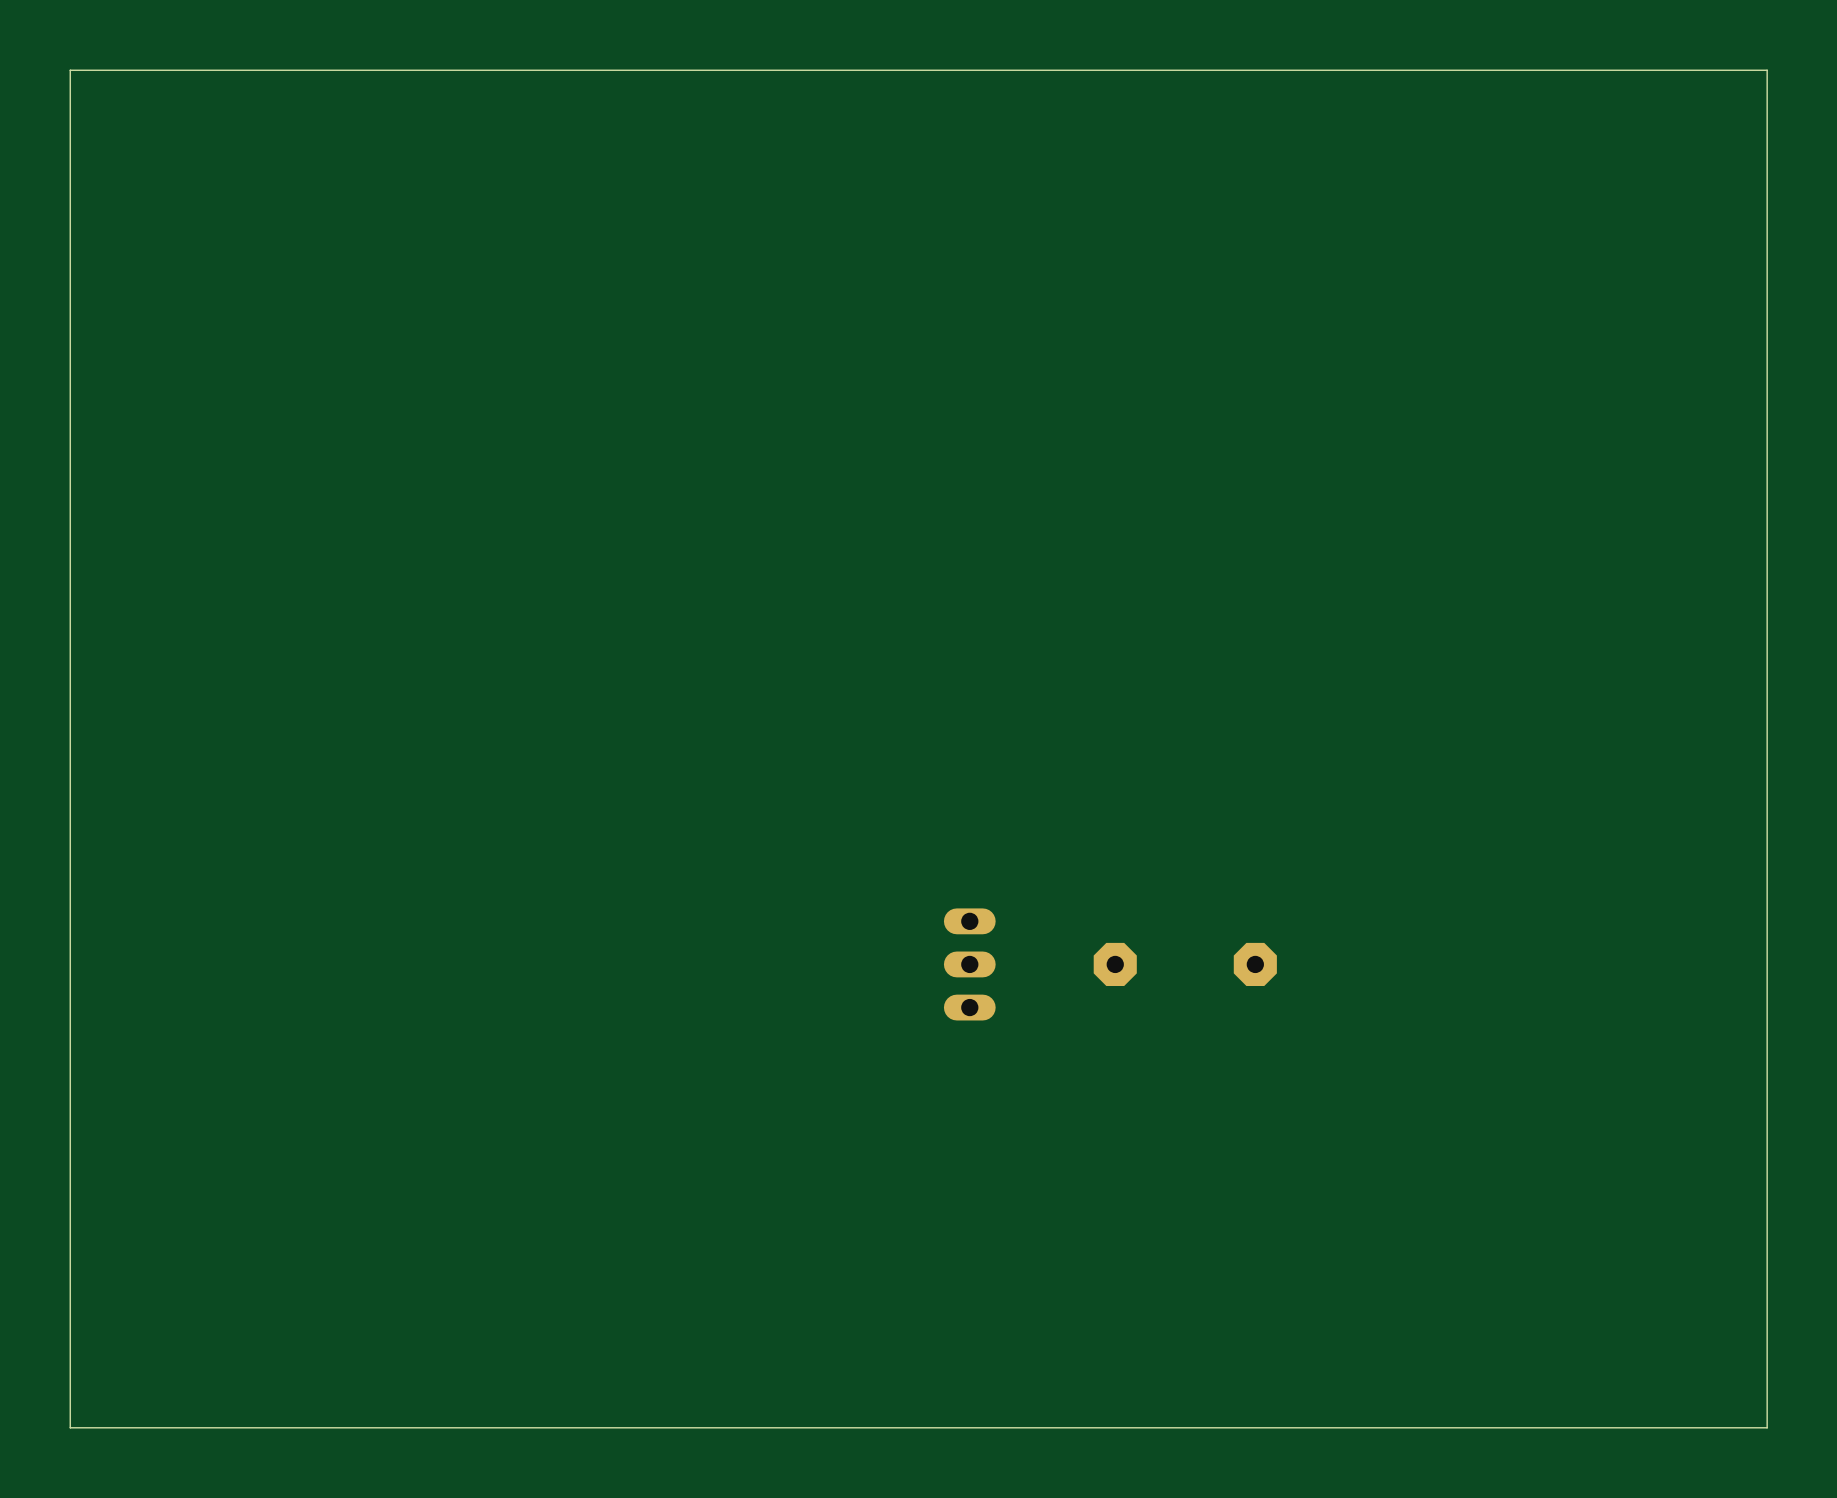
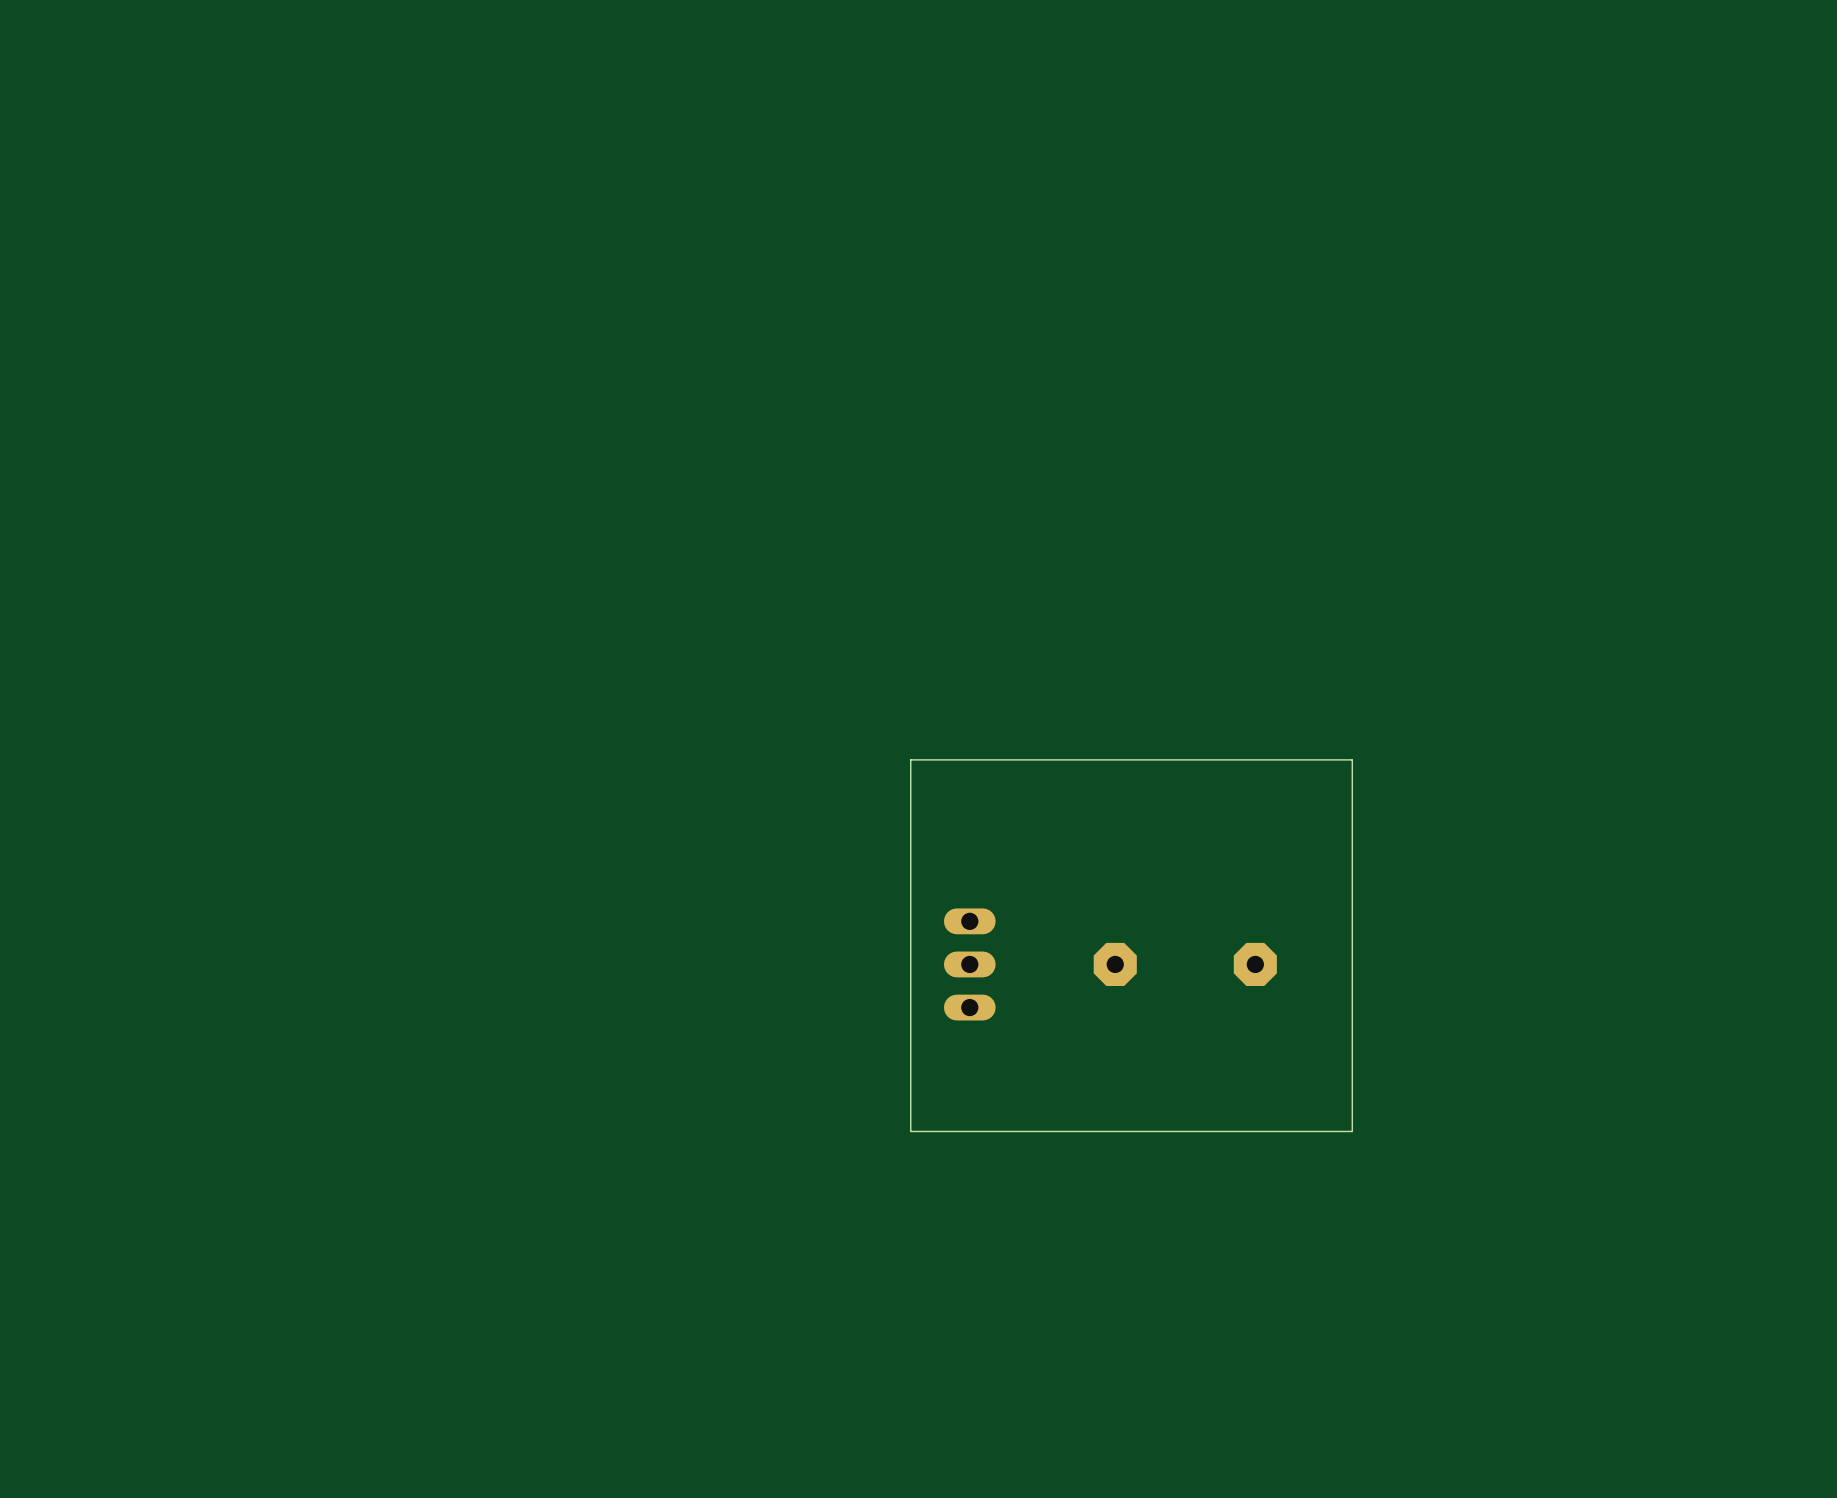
board edge: (1767, 70) (70, 70) (70, 1427) (1767, 1427) (1767, 70) -> none
board edge: none -> (1352, 759) (910, 759) (910, 1131) (1352, 1131) (1352, 759)

